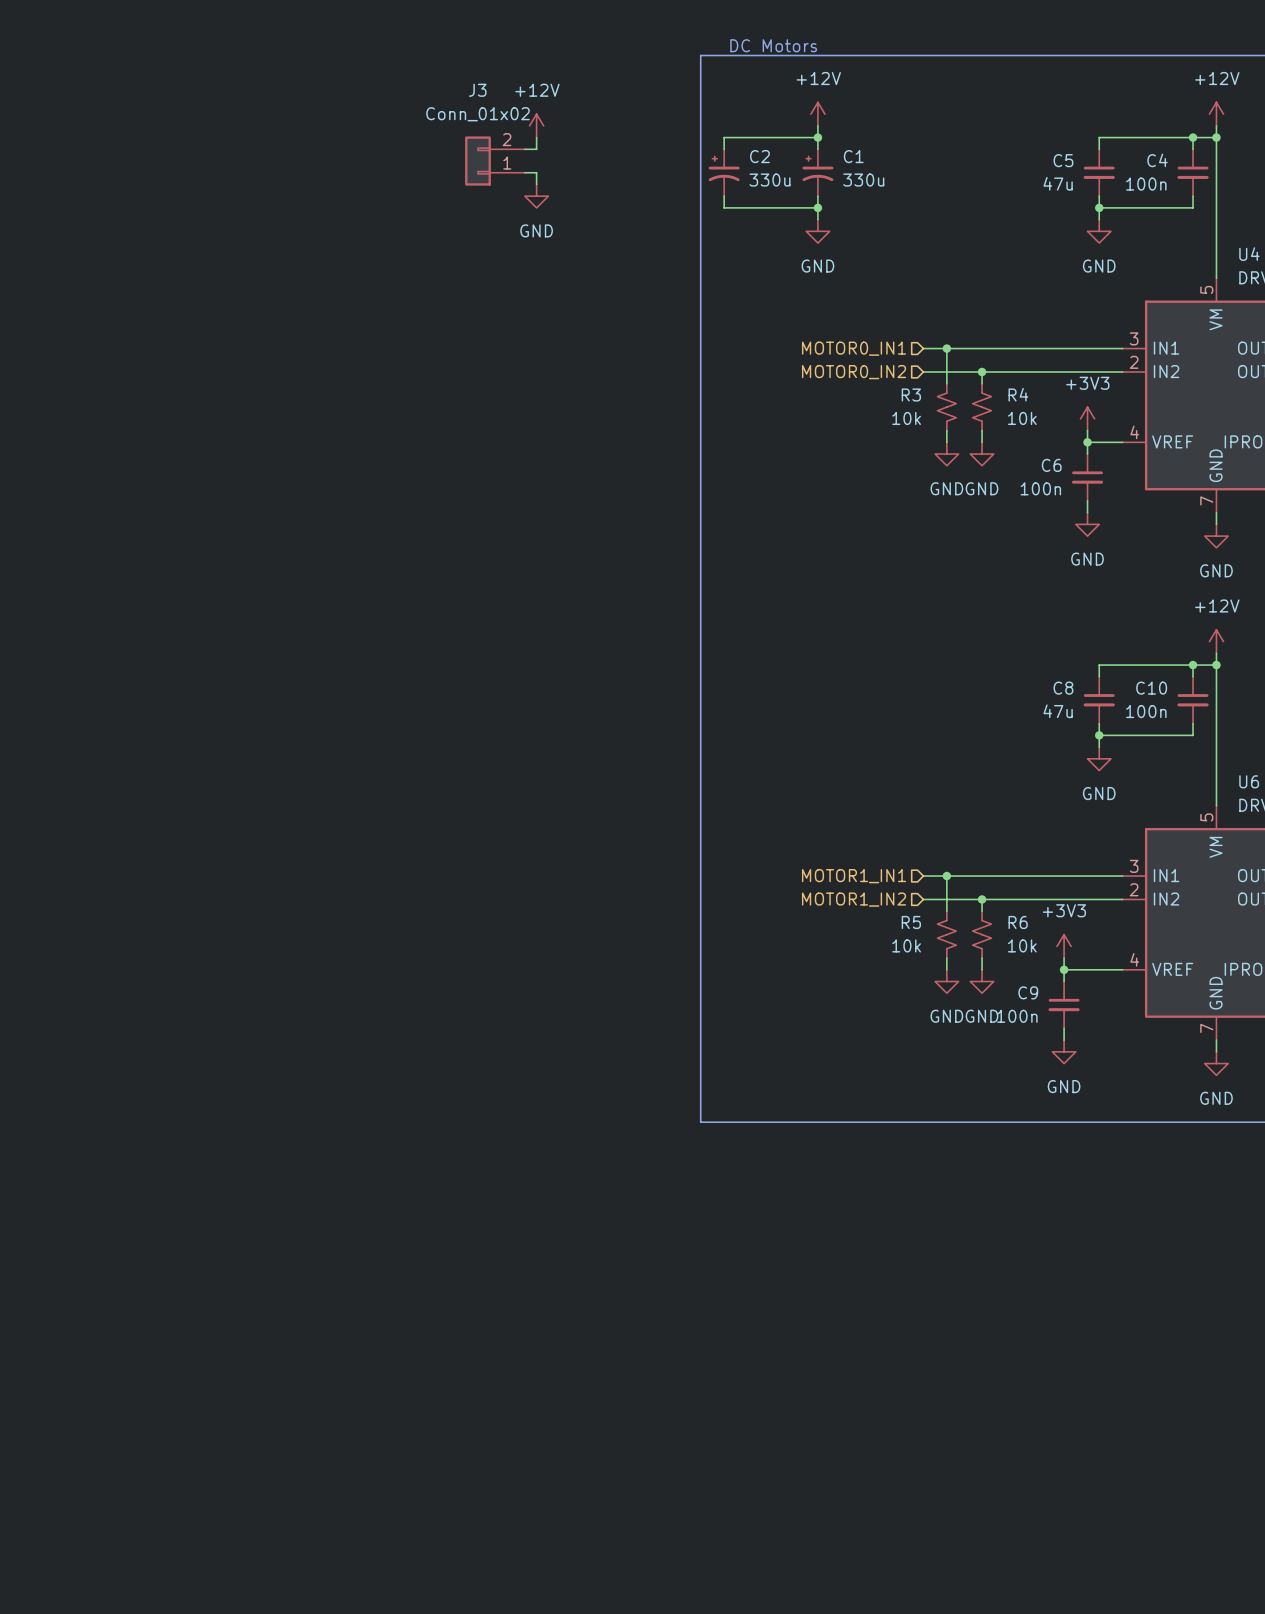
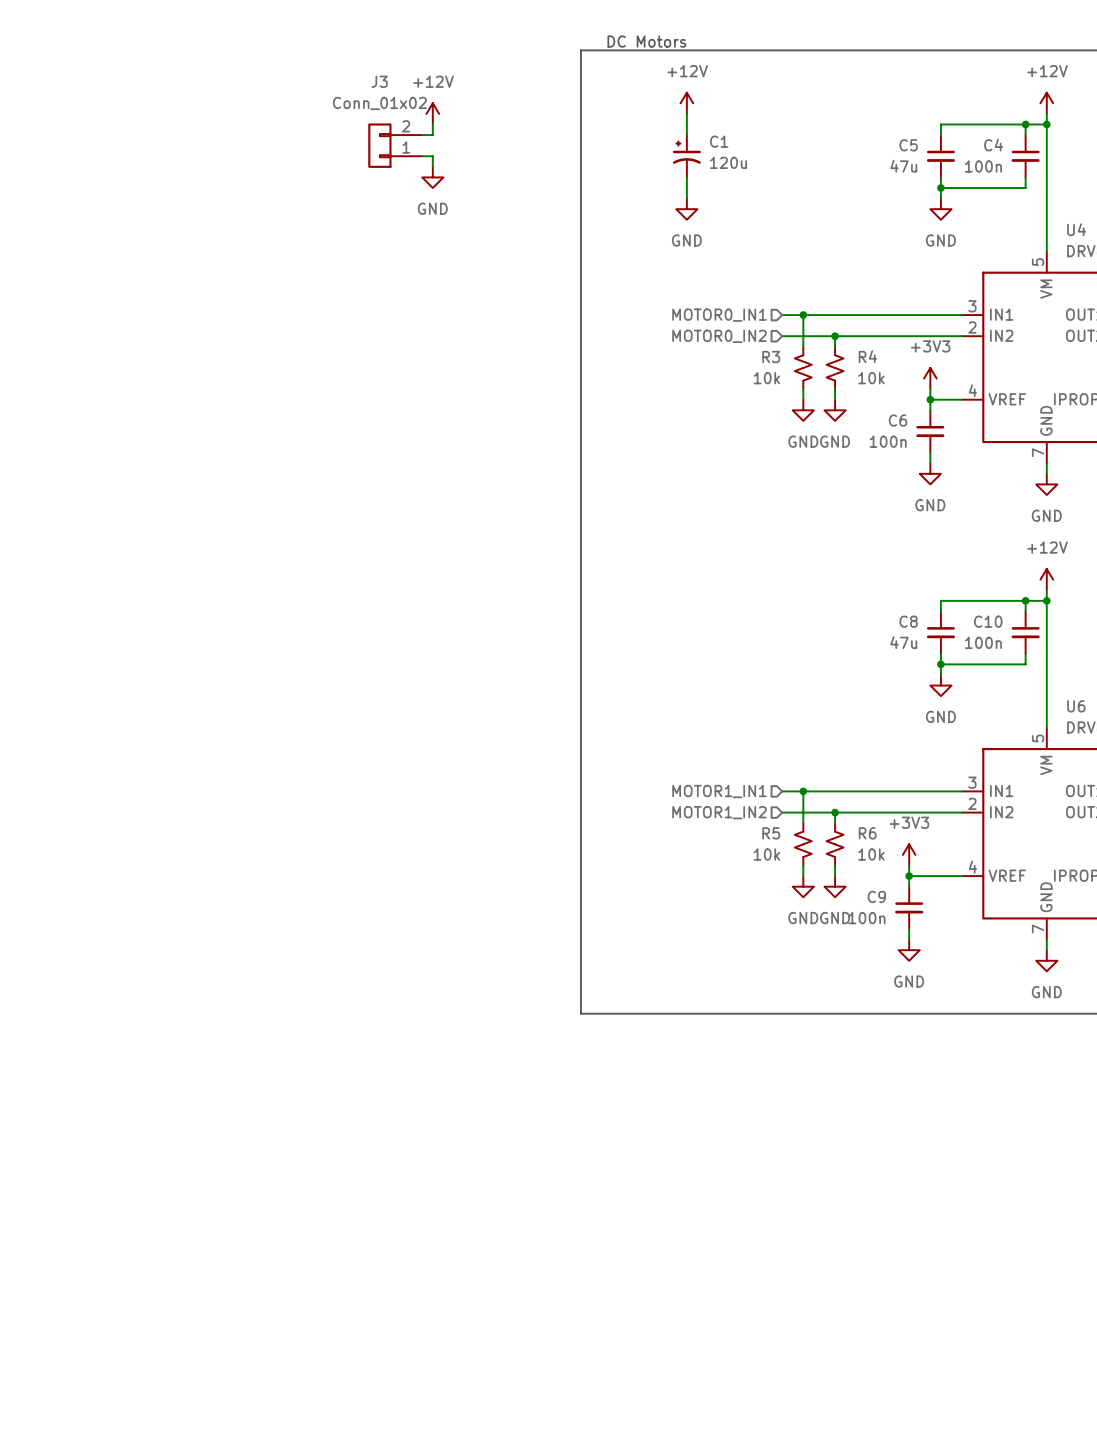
wire: (817, 137) (724, 137) (724, 149) -> none
junction: (817, 137) -> none
C2: 330u (724, 172) -> none
C1 value: 330u (863, 180) -> 120u (728, 162)
wire: (724, 196) (724, 207) (817, 207) -> none
junction: (817, 207) -> none

